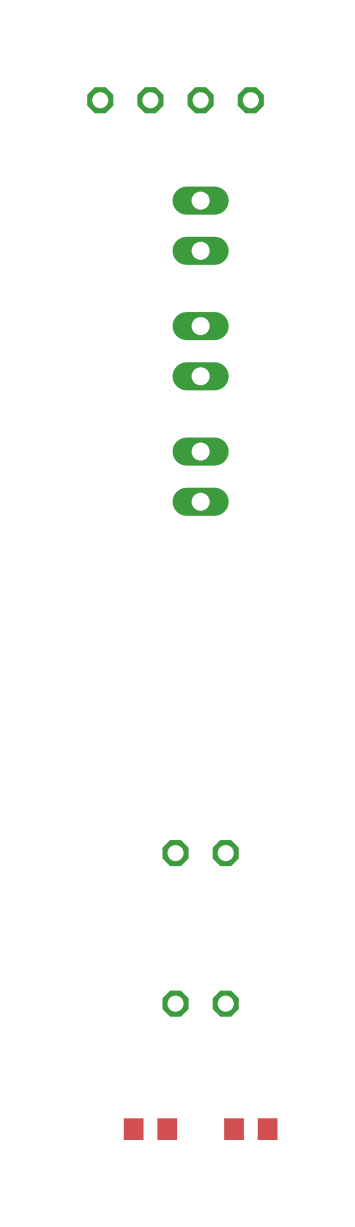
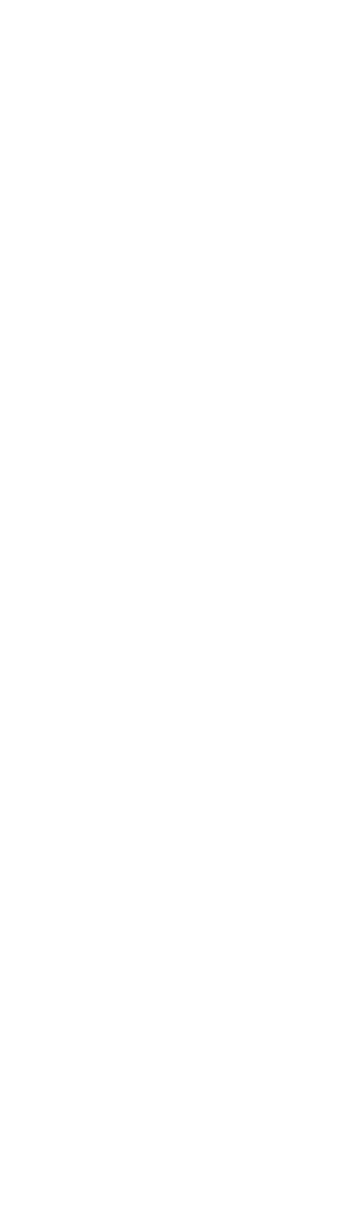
part: (125, 100) -> none
part: (225, 100) -> none
part: (200, 225) -> none
part: (200, 351) -> none
part: (200, 476) -> none
part: (200, 853) -> none
part: (200, 1003) -> none
part: (150, 1129) -> none
part: (250, 1129) -> none

